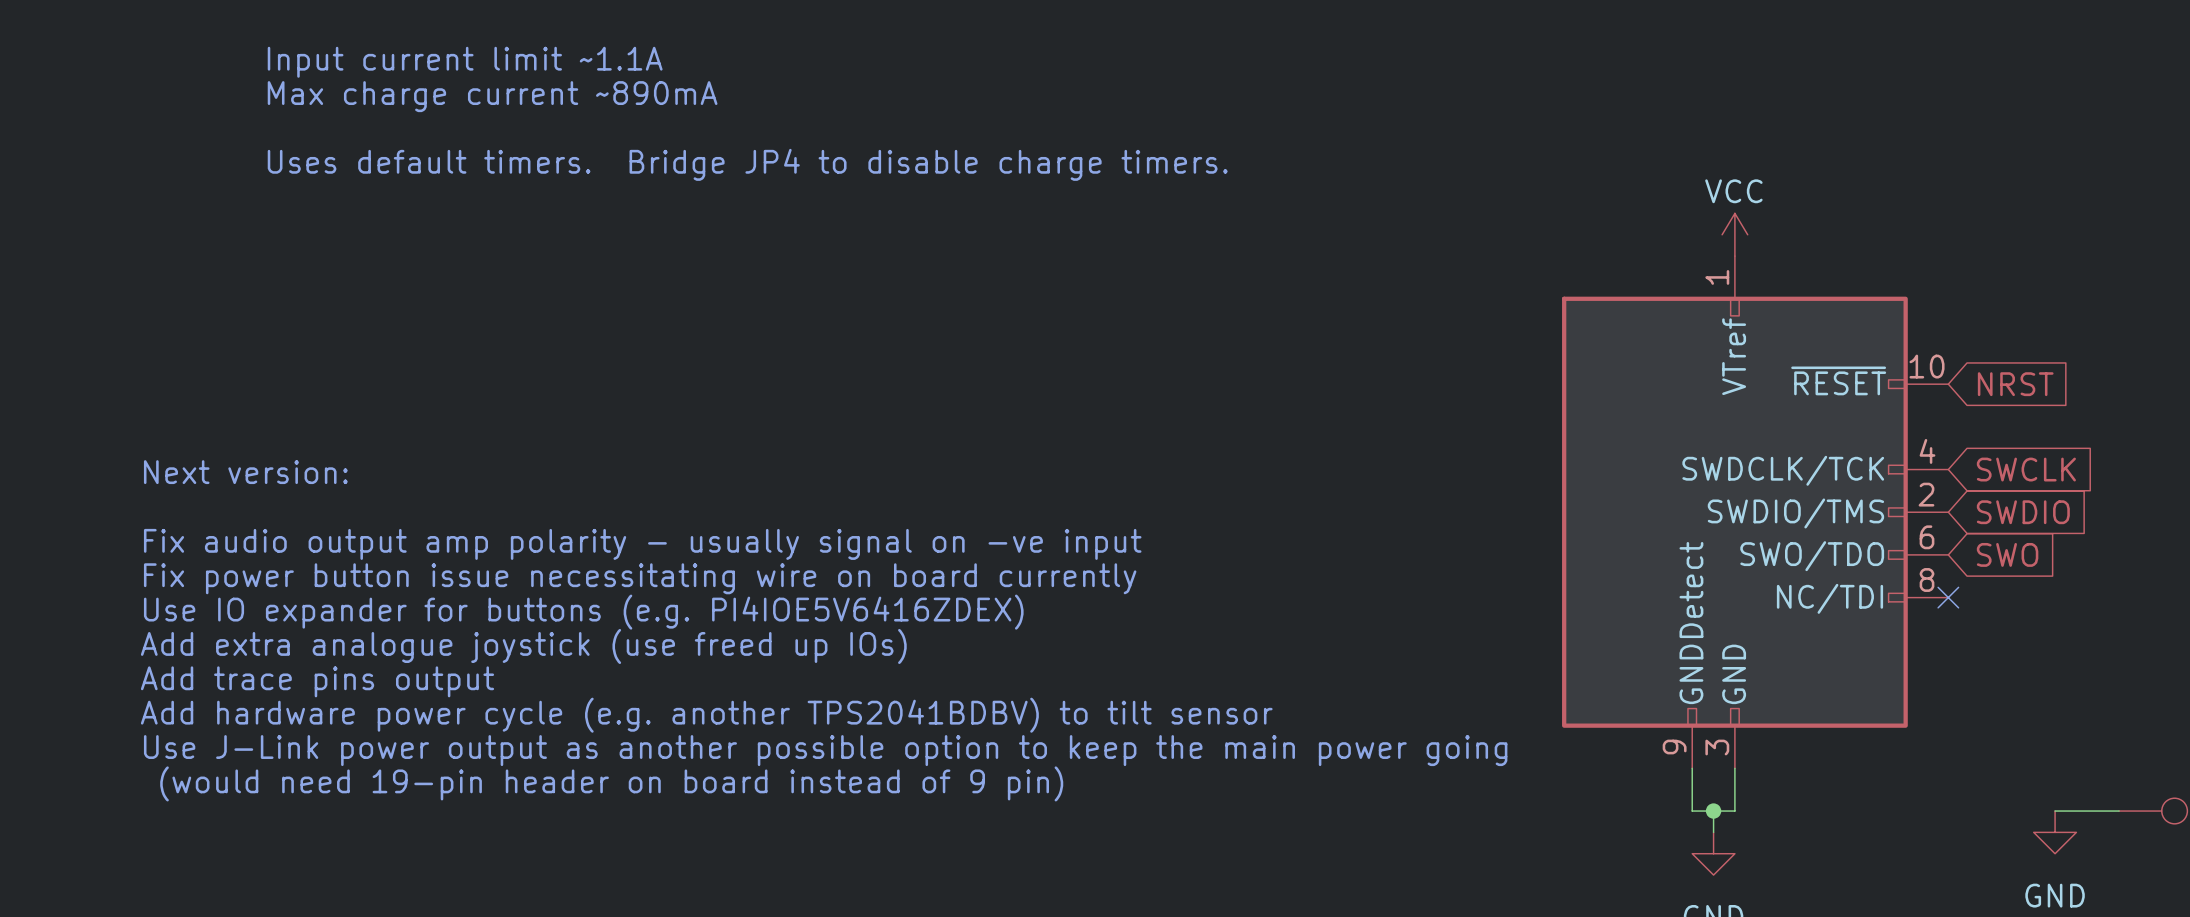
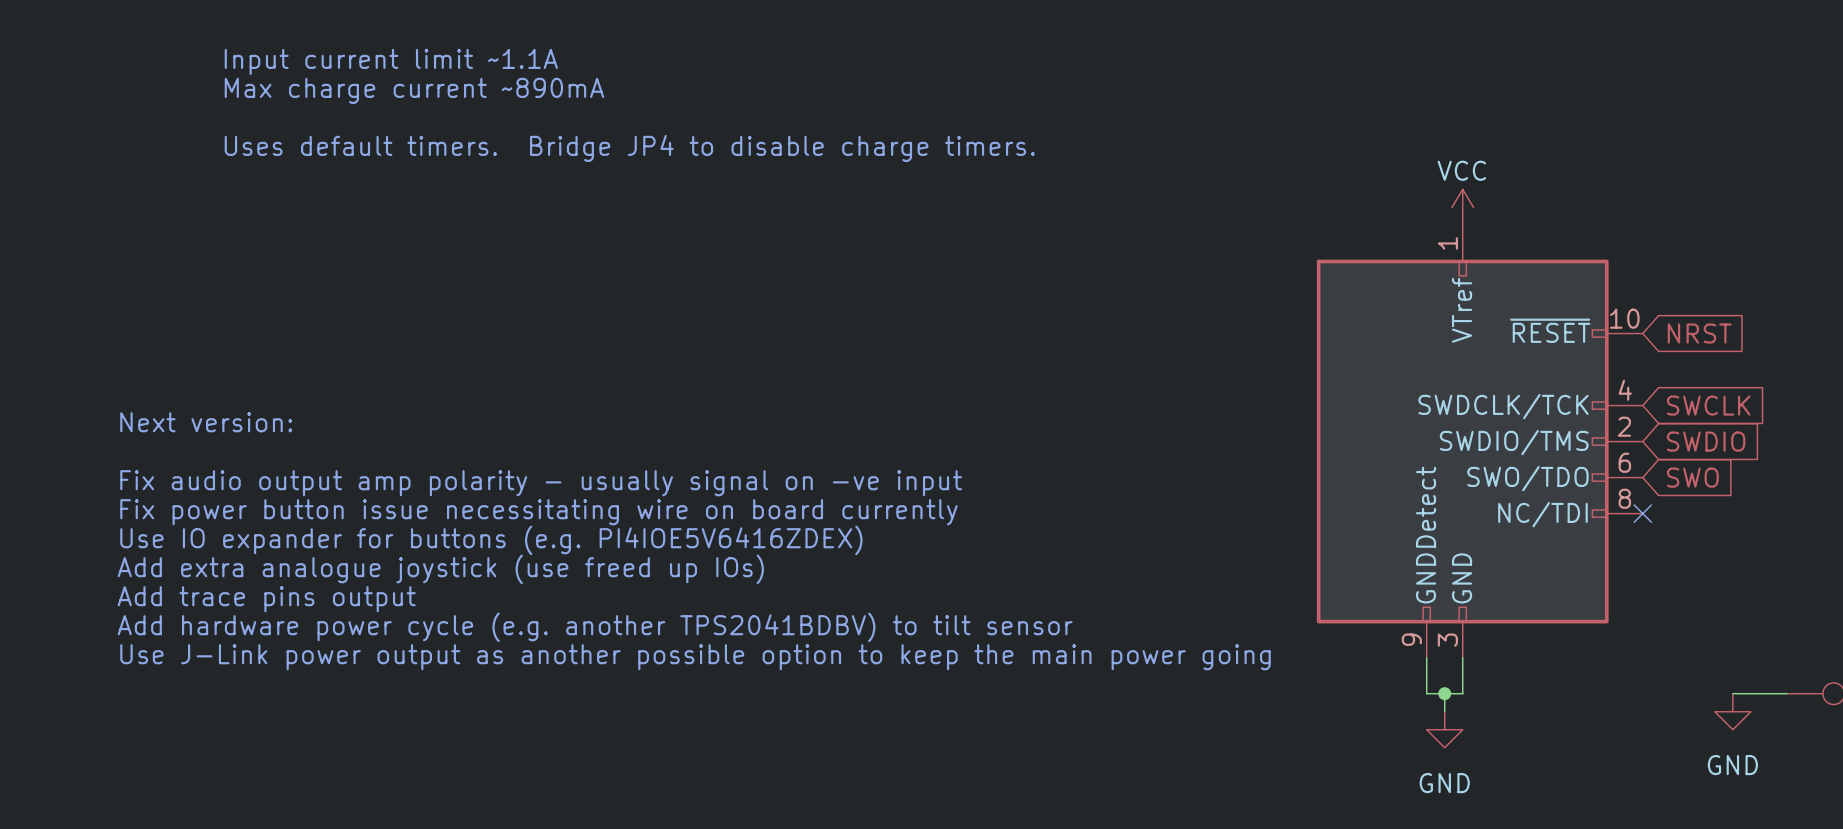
text position: Next version: (245, 472) -> Next version: (206, 422)
text position: Fix audio output amp polarity - usually signal on -ve input (642, 544) -> Fix audio output amp polarity - usually signal on -ve input (541, 483)
text position: Fix power button issue necessitating wire on board currently (640, 578) -> Fix power button issue necessitating wire on board currently (538, 512)
text position: Use IO expander for buttons (e.g. PI4IOE5V6416ZDEX) (583, 612) -> Use IO expander for buttons (e.g. PI4IOE5V6416ZDEX) (491, 540)
text position: Add extra analogue joystick (use freed up IOs) (523, 646) -> Add extra analogue joystick (use freed up IOs) (440, 569)
text position: Add trace pins output (317, 681) -> Add trace pins output (266, 599)
text position: Add hardware power cycle (e.g. another TPS2041BDBV) to tilt sensor (706, 715) -> Add hardware power cycle (e.g. another TPS2041BDBV) to tilt sensor (595, 627)
text position: Use J-Link power output as another possible option to keep the main power going (825, 750) -> Use J-Link power output as another possible option to keep the main power going (695, 657)
text: (would need 19-pin header on board instead of 9 pin) (611, 783) -> none

